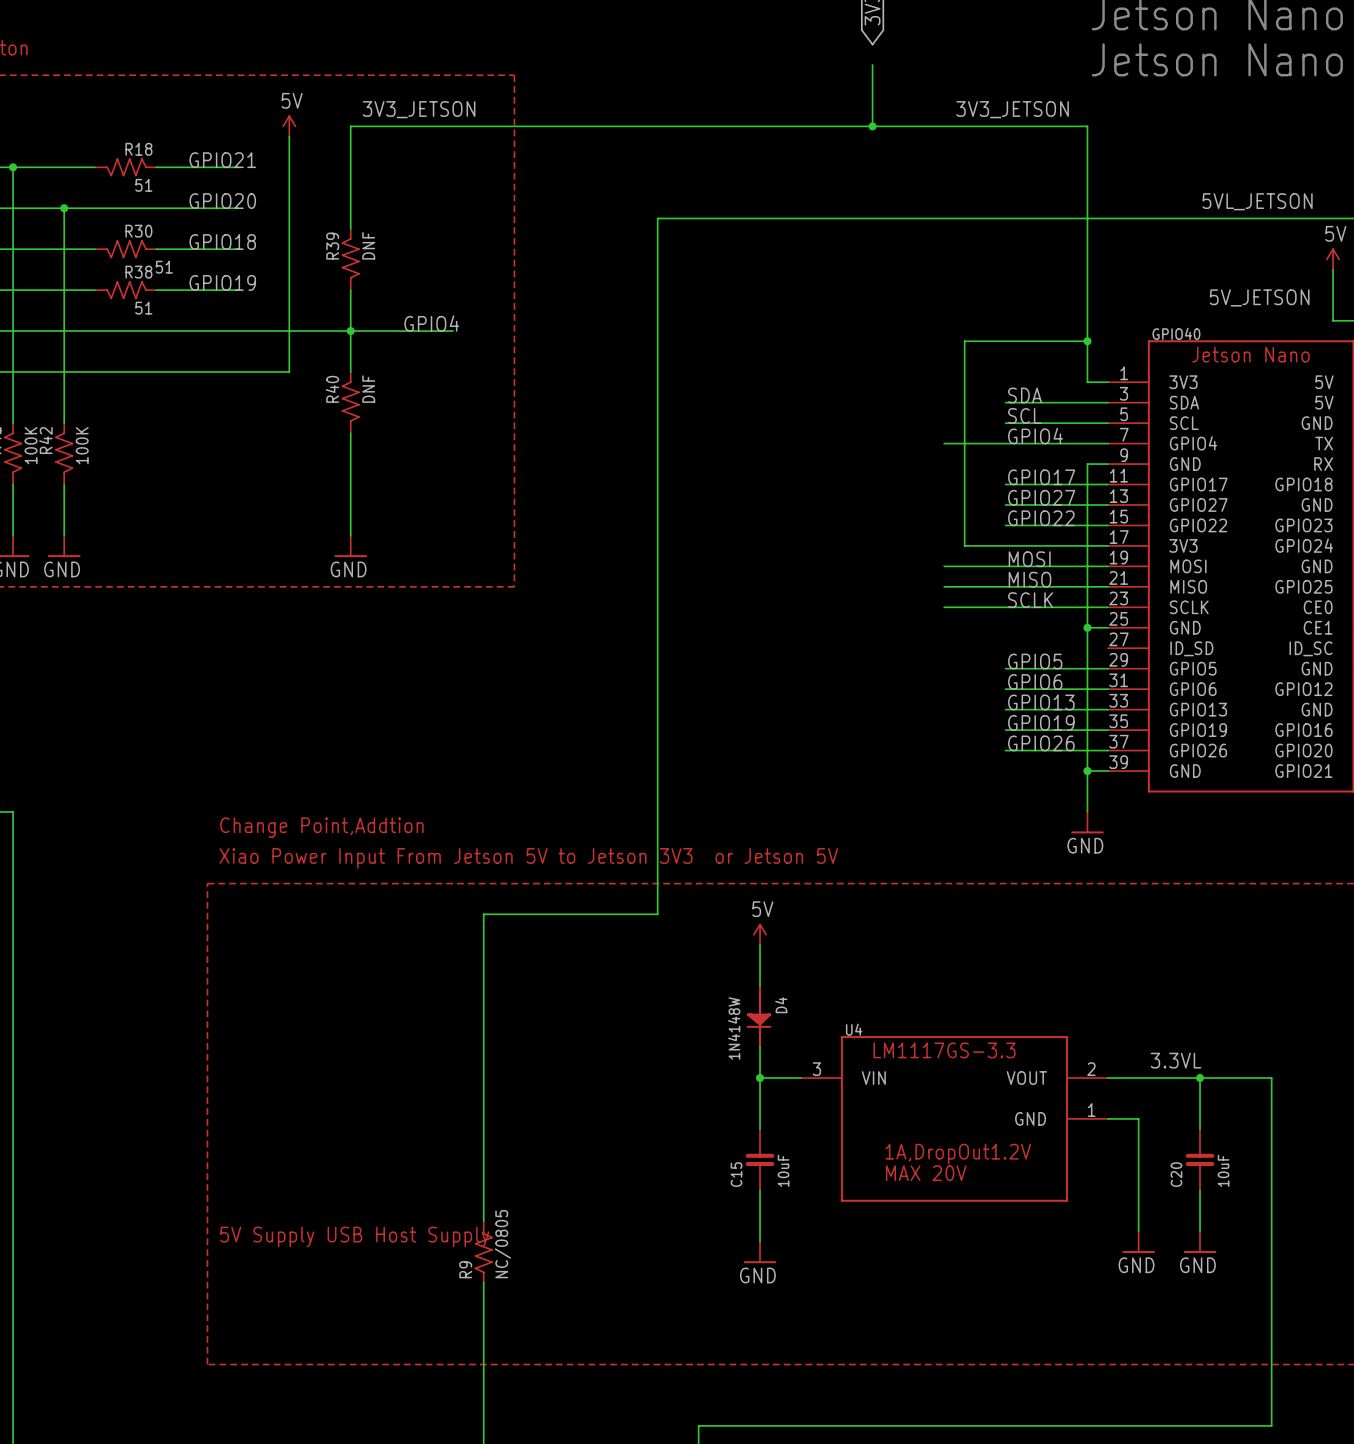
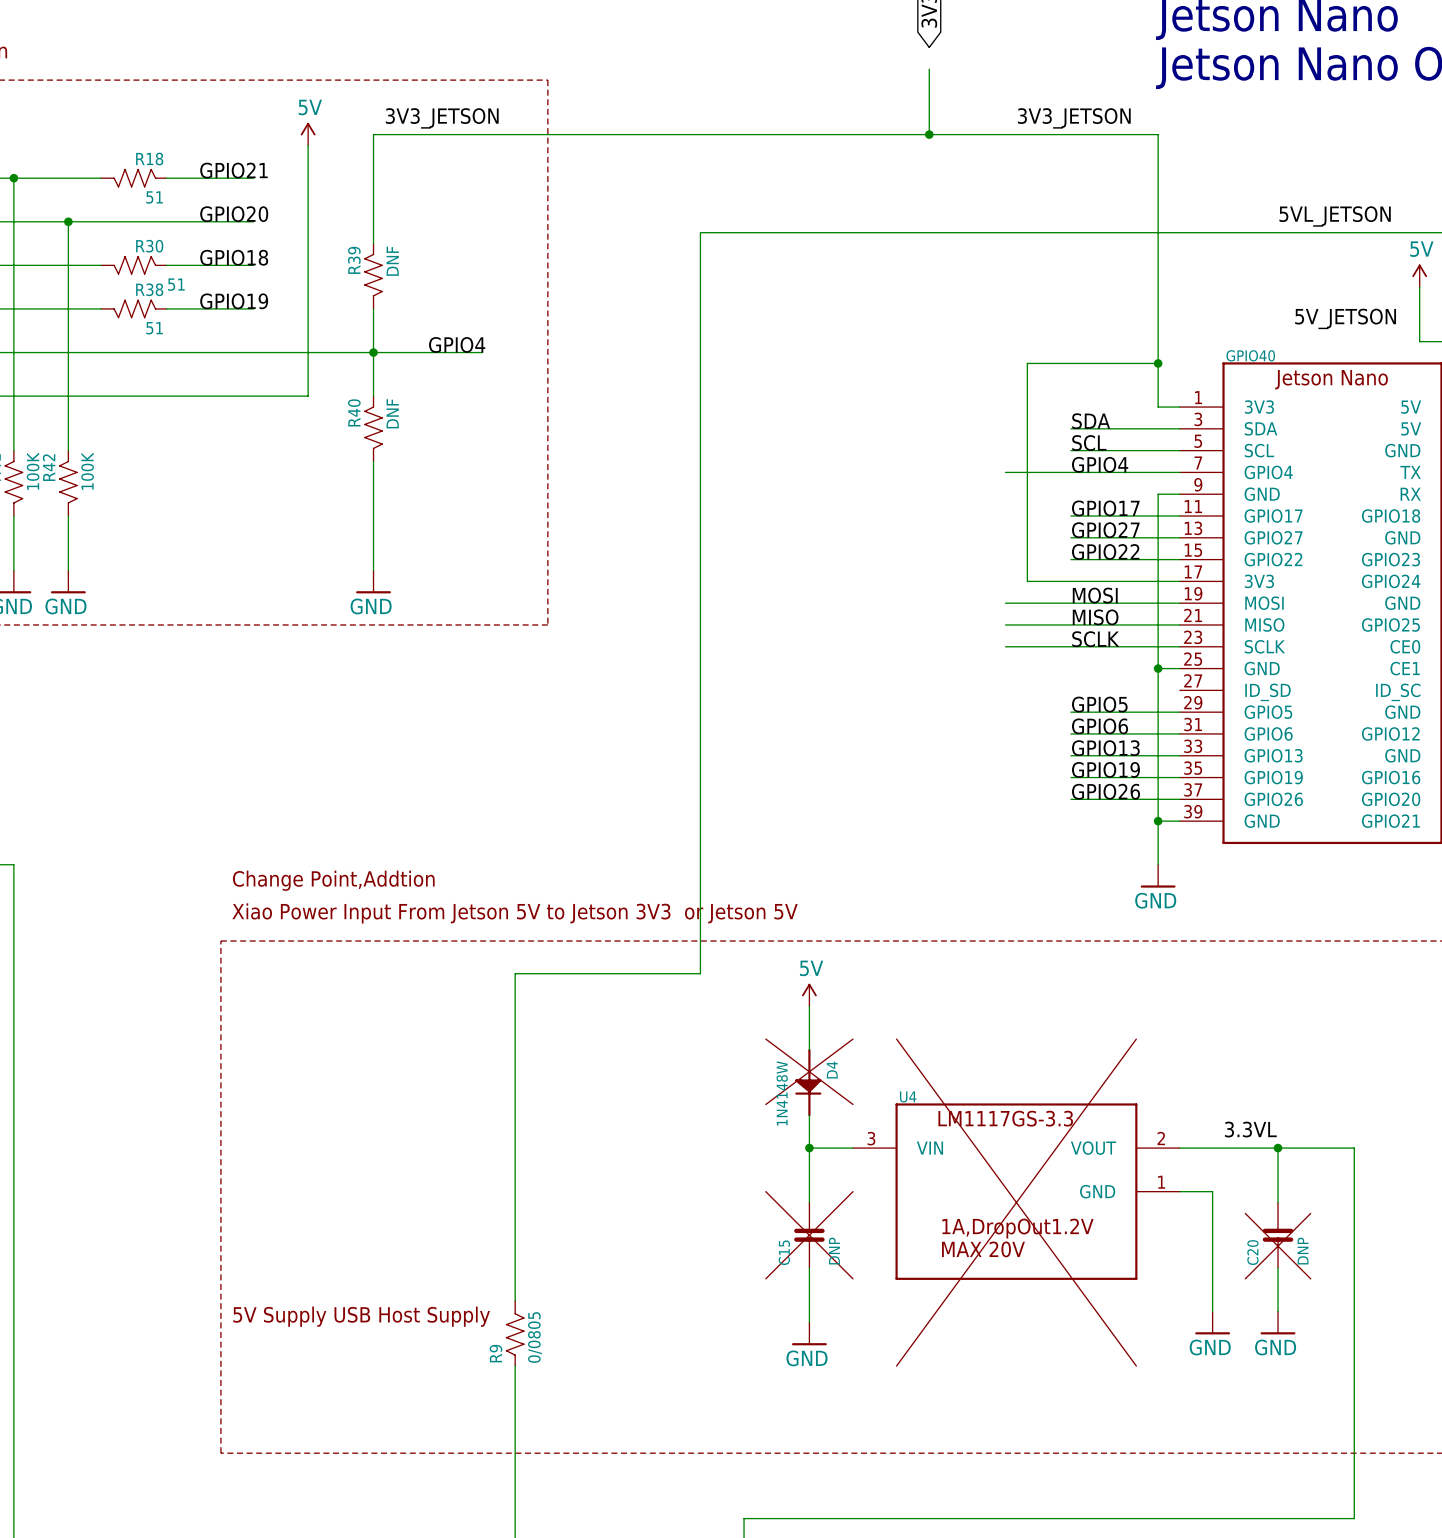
line: none -> (765, 1039) (853, 1104)
line: none -> (853, 1039) (765, 1104)
line: none -> (896, 1039) (1136, 1366)
line: none -> (1136, 1039) (896, 1366)
line: none -> (765, 1191) (853, 1278)
line: none -> (853, 1191) (765, 1278)
line: none -> (1245, 1213) (1310, 1278)
line: none -> (1310, 1213) (1245, 1278)
C15 value: 10uF (783, 1170) -> DNP (834, 1251)
C20 value: 10uF (1223, 1170) -> DNP (1303, 1251)
R9 value: NC/0805 (502, 1244) -> 0/0805 (535, 1337)

